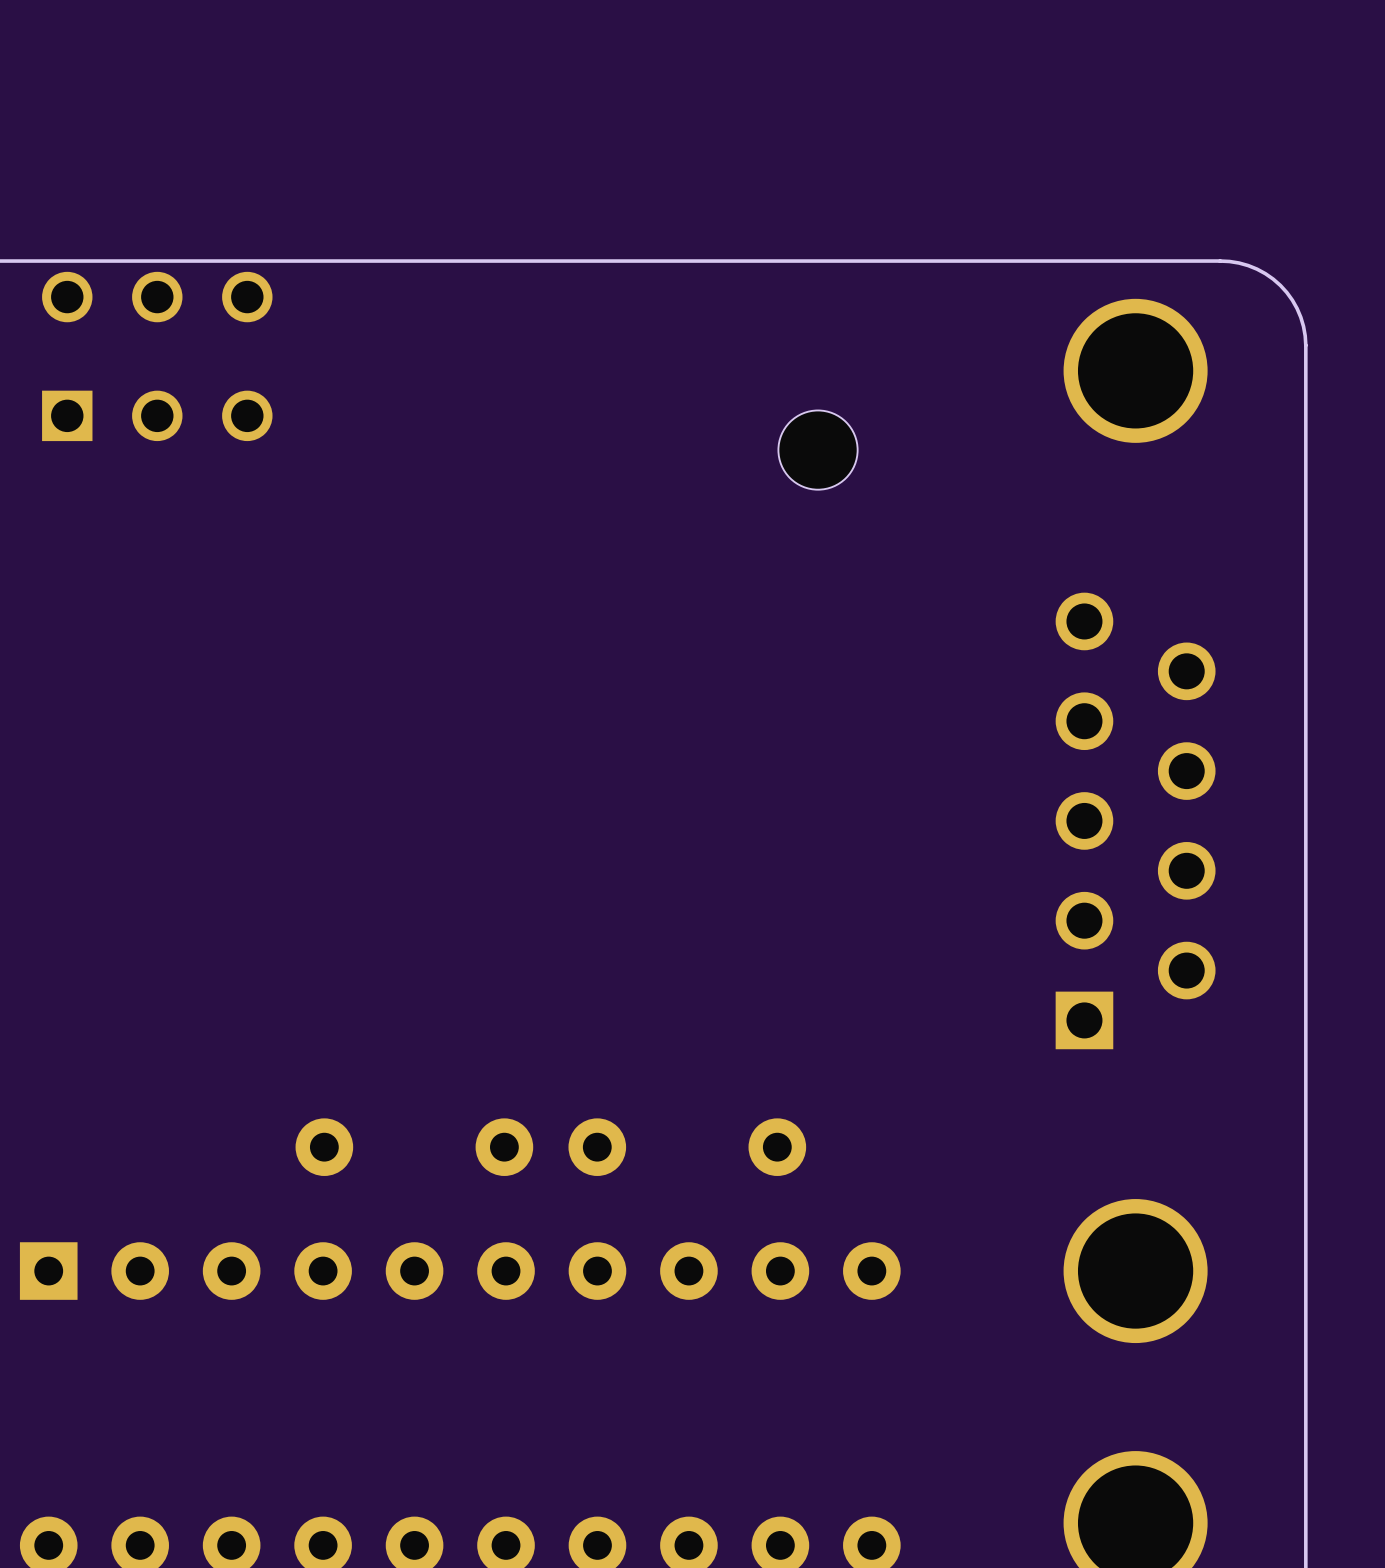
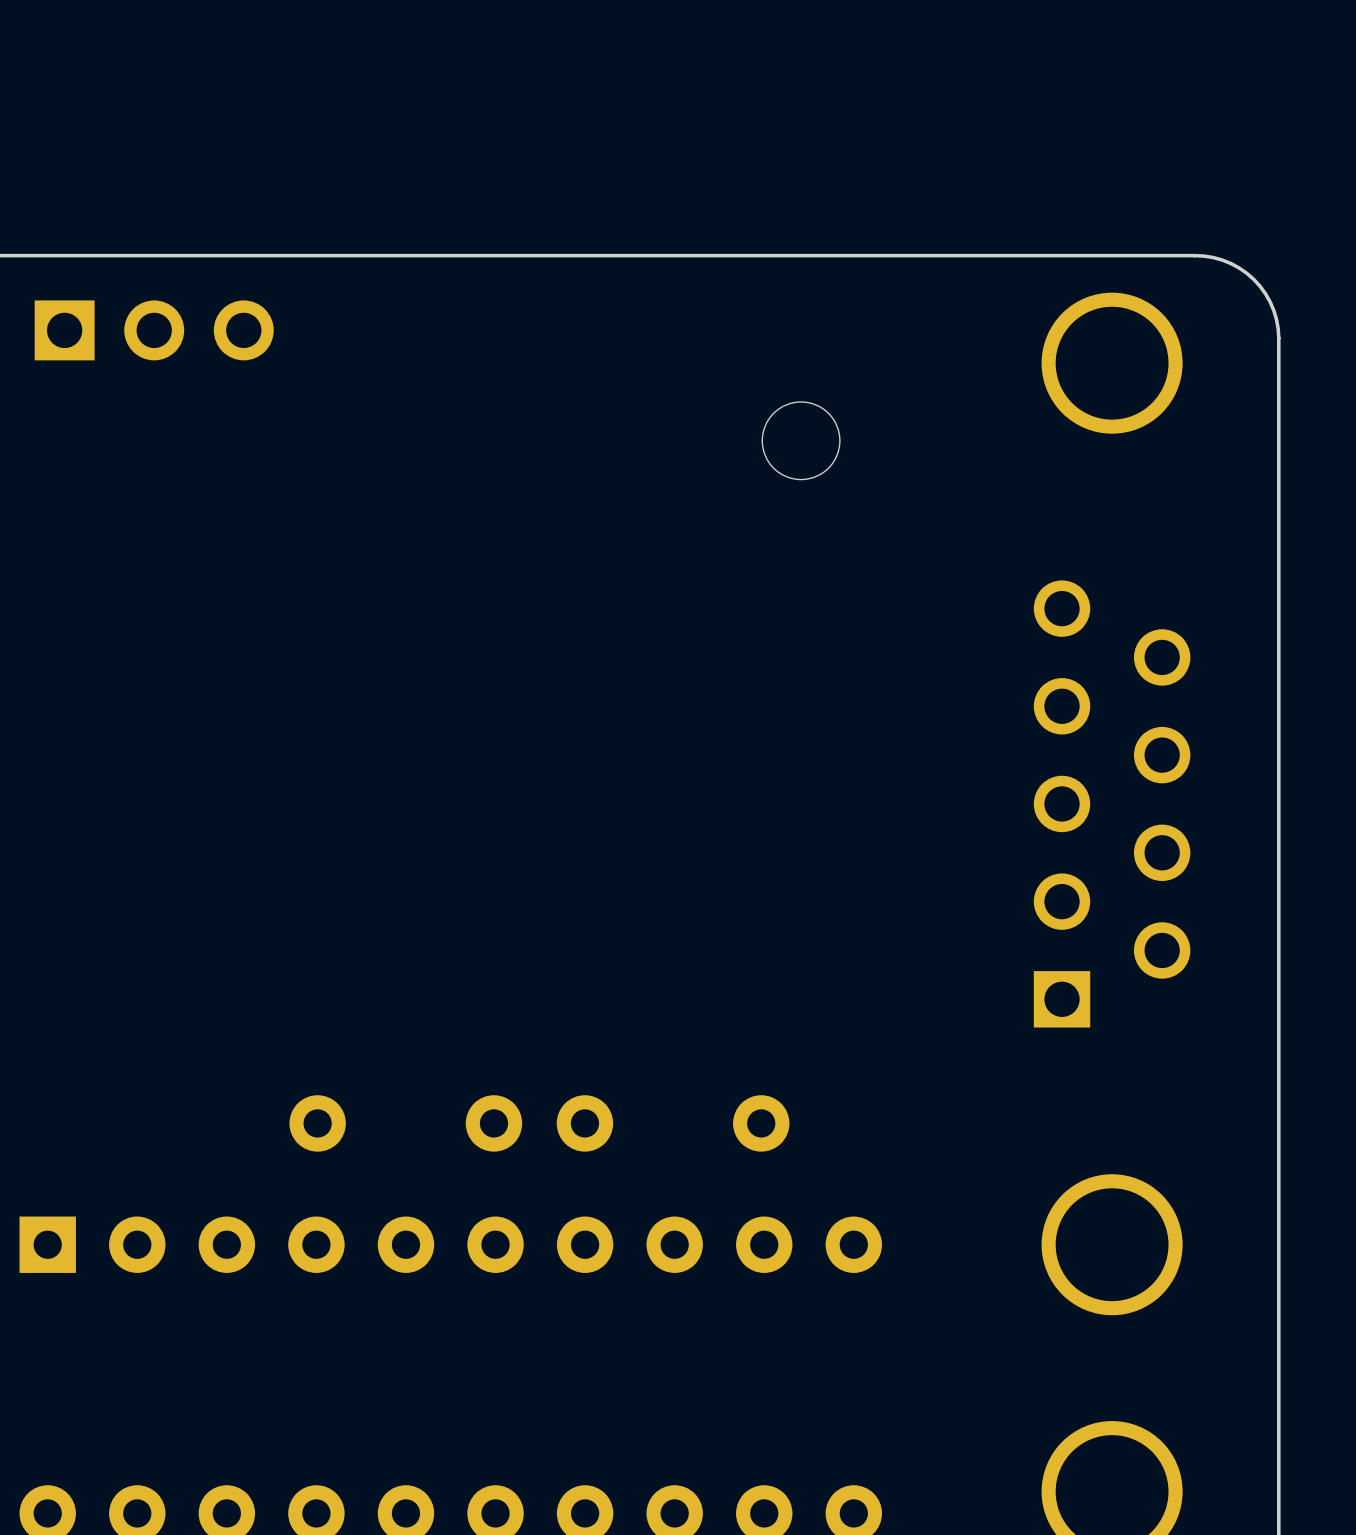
part footprint: [42, 271, 273, 442] -> [34, 300, 274, 361]

